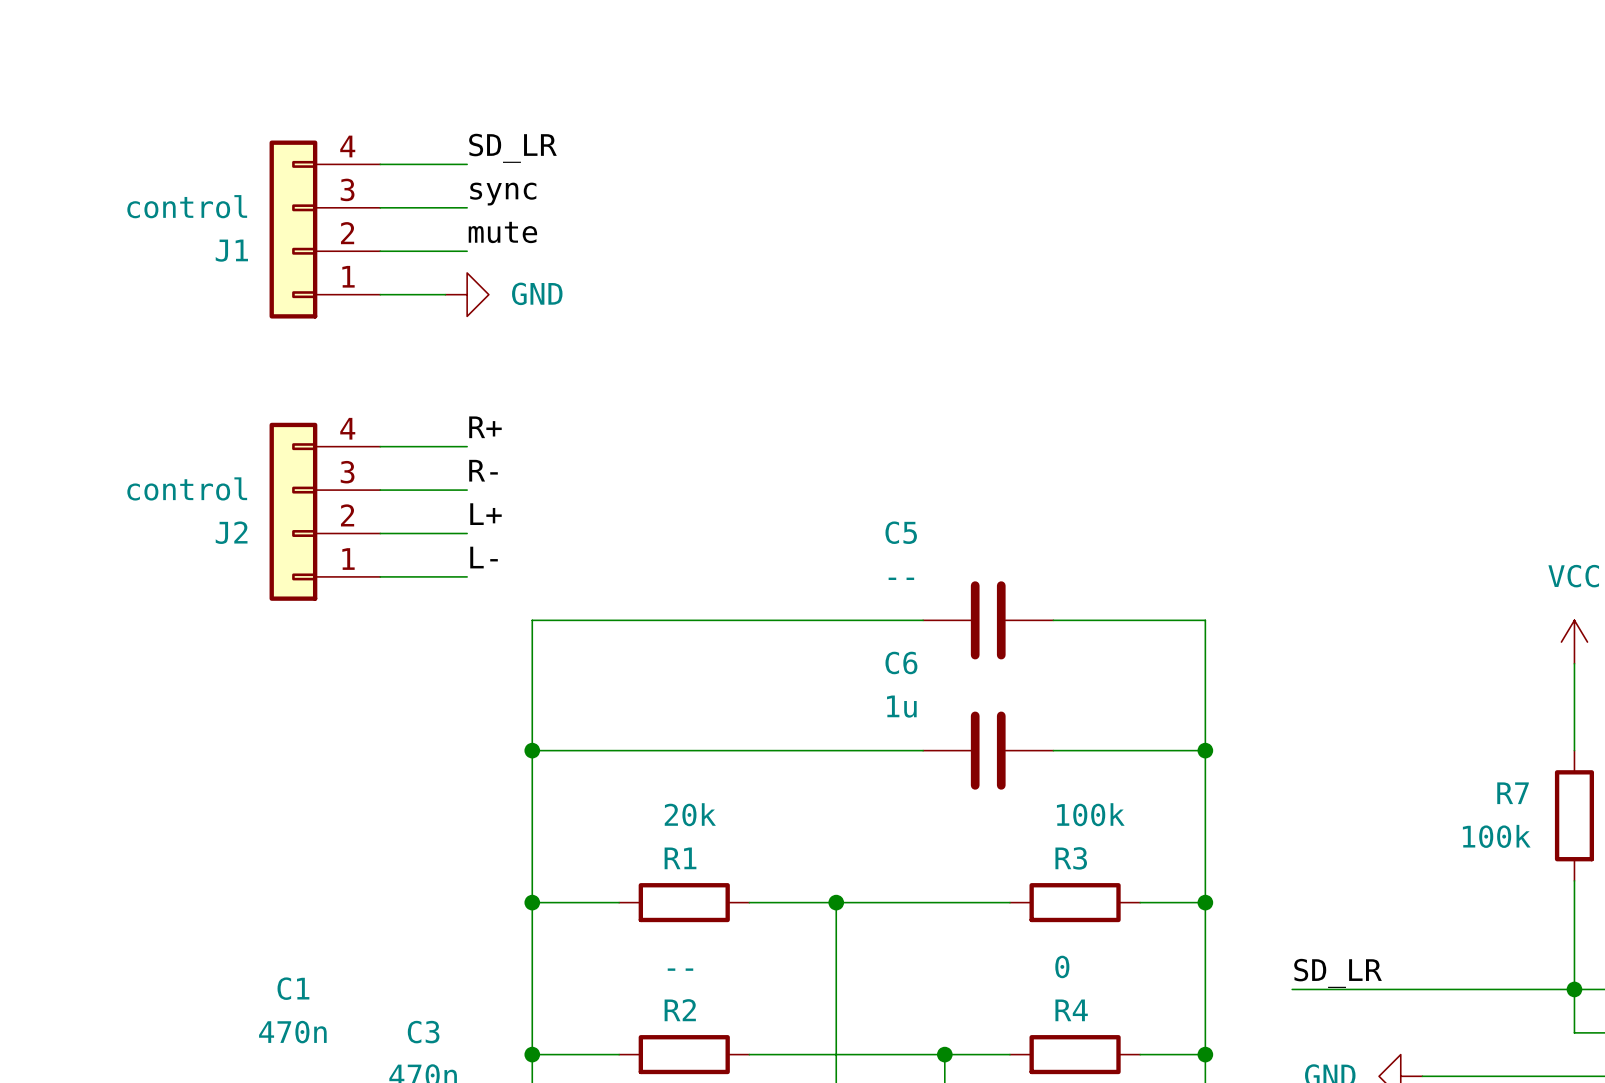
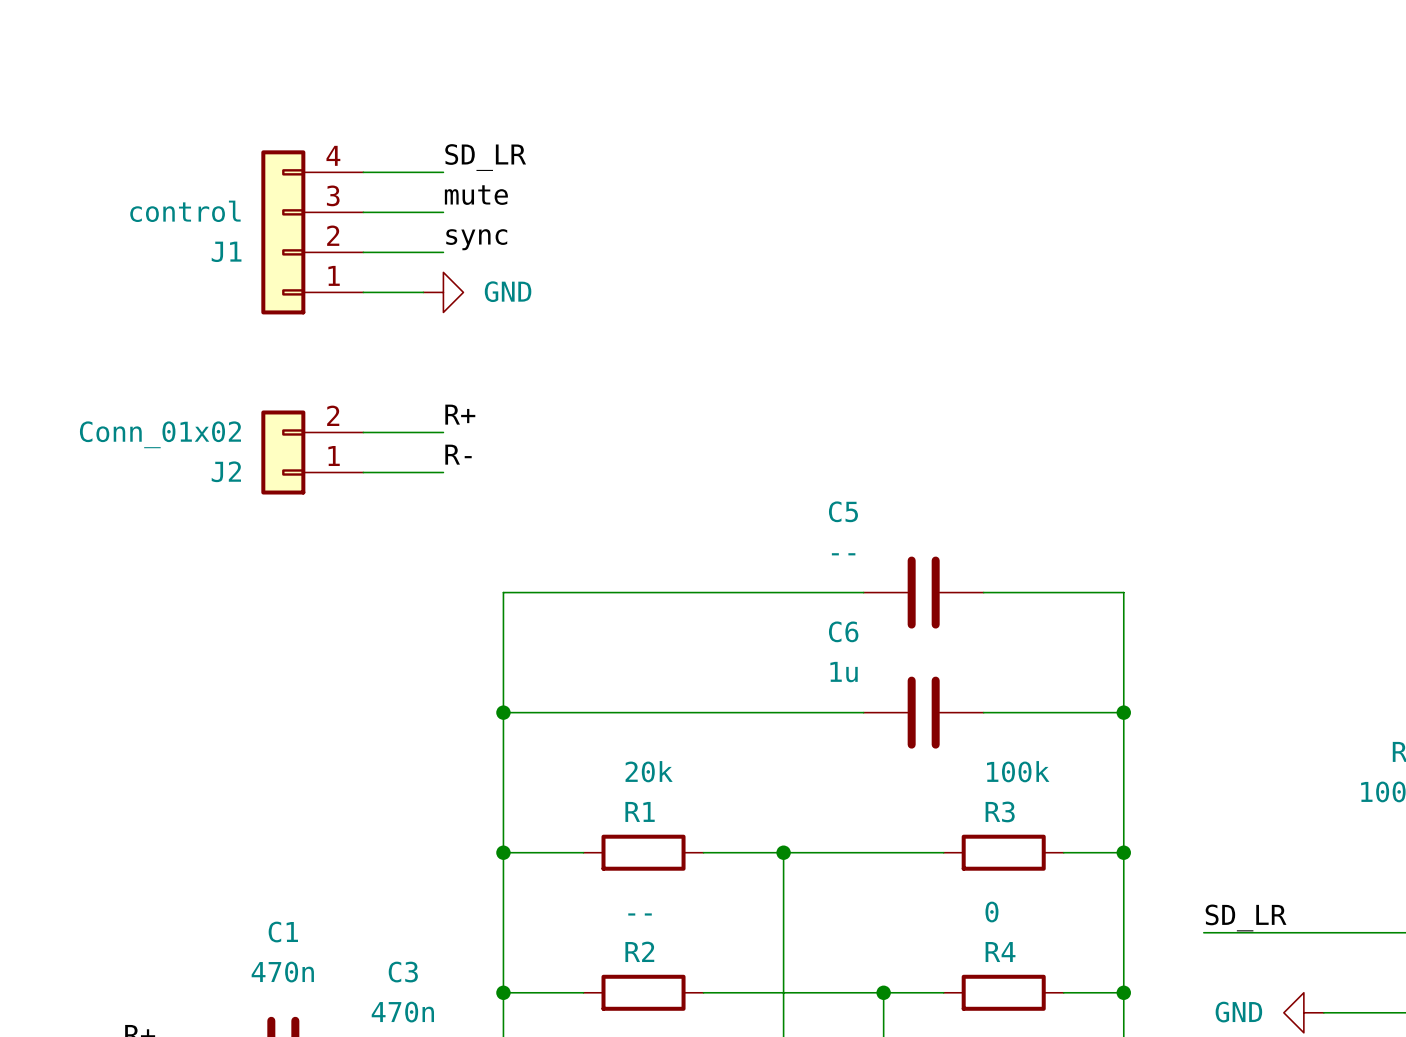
label: sync (503, 194) -> mute (476, 195)
label: mute (502, 232) -> sync (476, 239)
J2 symbol: [269, 422, 381, 601] -> [261, 410, 364, 495]
J2 value: control (187, 488) -> Conn_01x02 (160, 434)
label: L+ (485, 514) -> none
wire: (380, 533) (467, 533) -> none
label: L- (484, 557) -> none
wire: (380, 576) (467, 576) -> none

